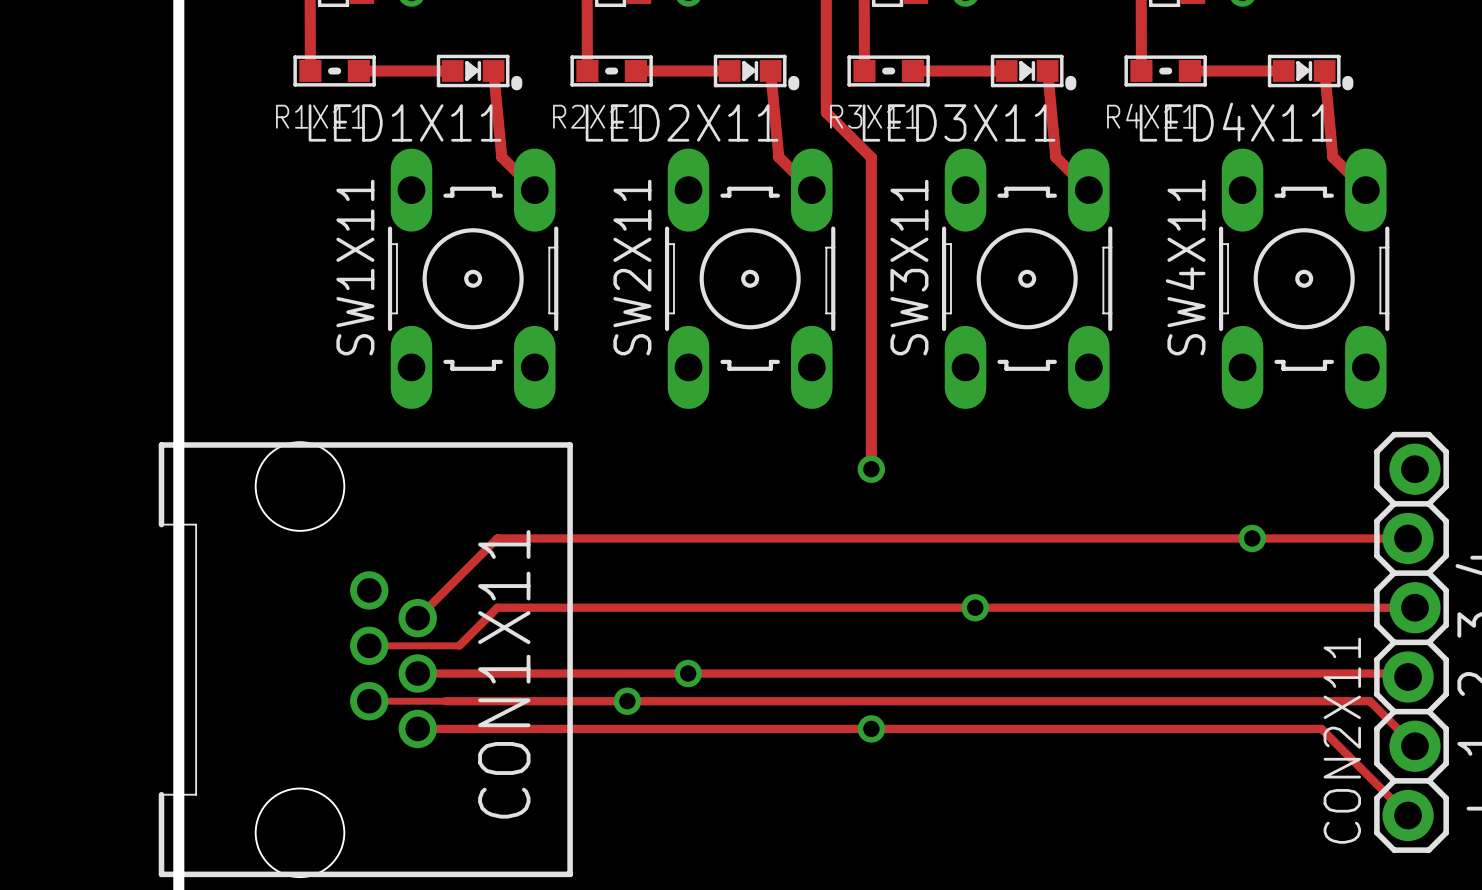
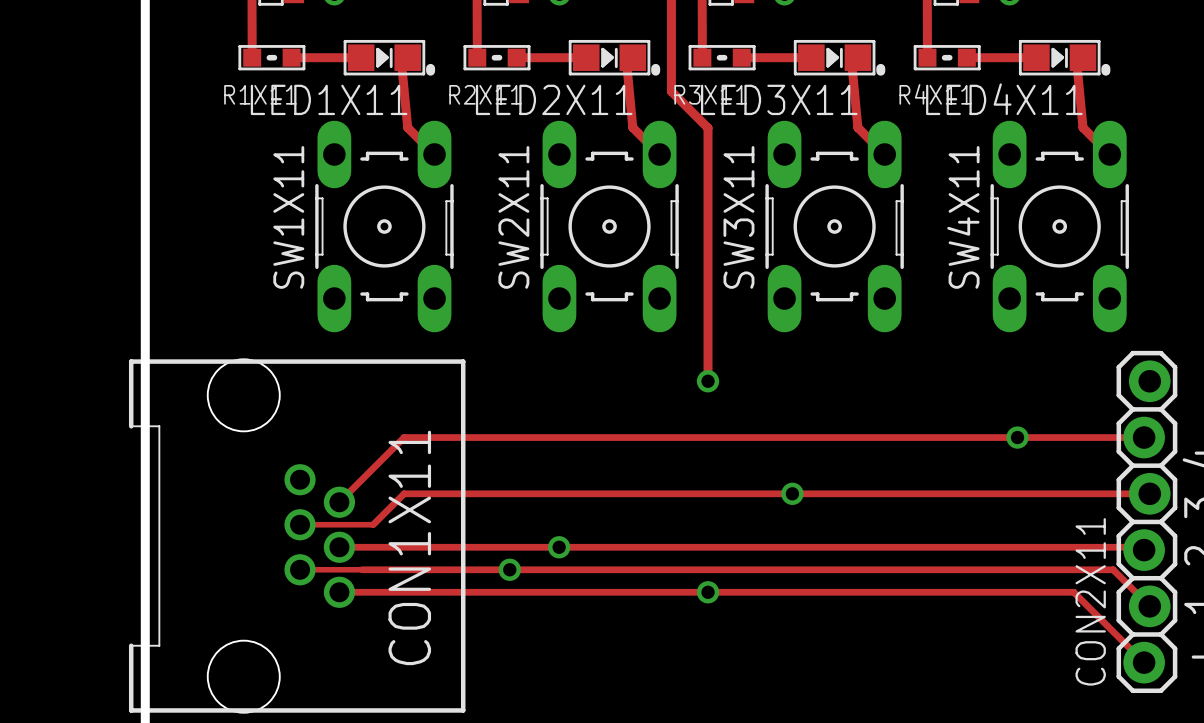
LED1X11 footprint: [436, 54, 523, 91] -> [343, 39, 436, 76]
LED2X11 footprint: [713, 54, 800, 91] -> [568, 39, 661, 76]
LED3X11 footprint: [990, 54, 1077, 91] -> [793, 39, 886, 76]
LED4X11 footprint: [1267, 54, 1354, 91] -> [1018, 39, 1111, 76]

